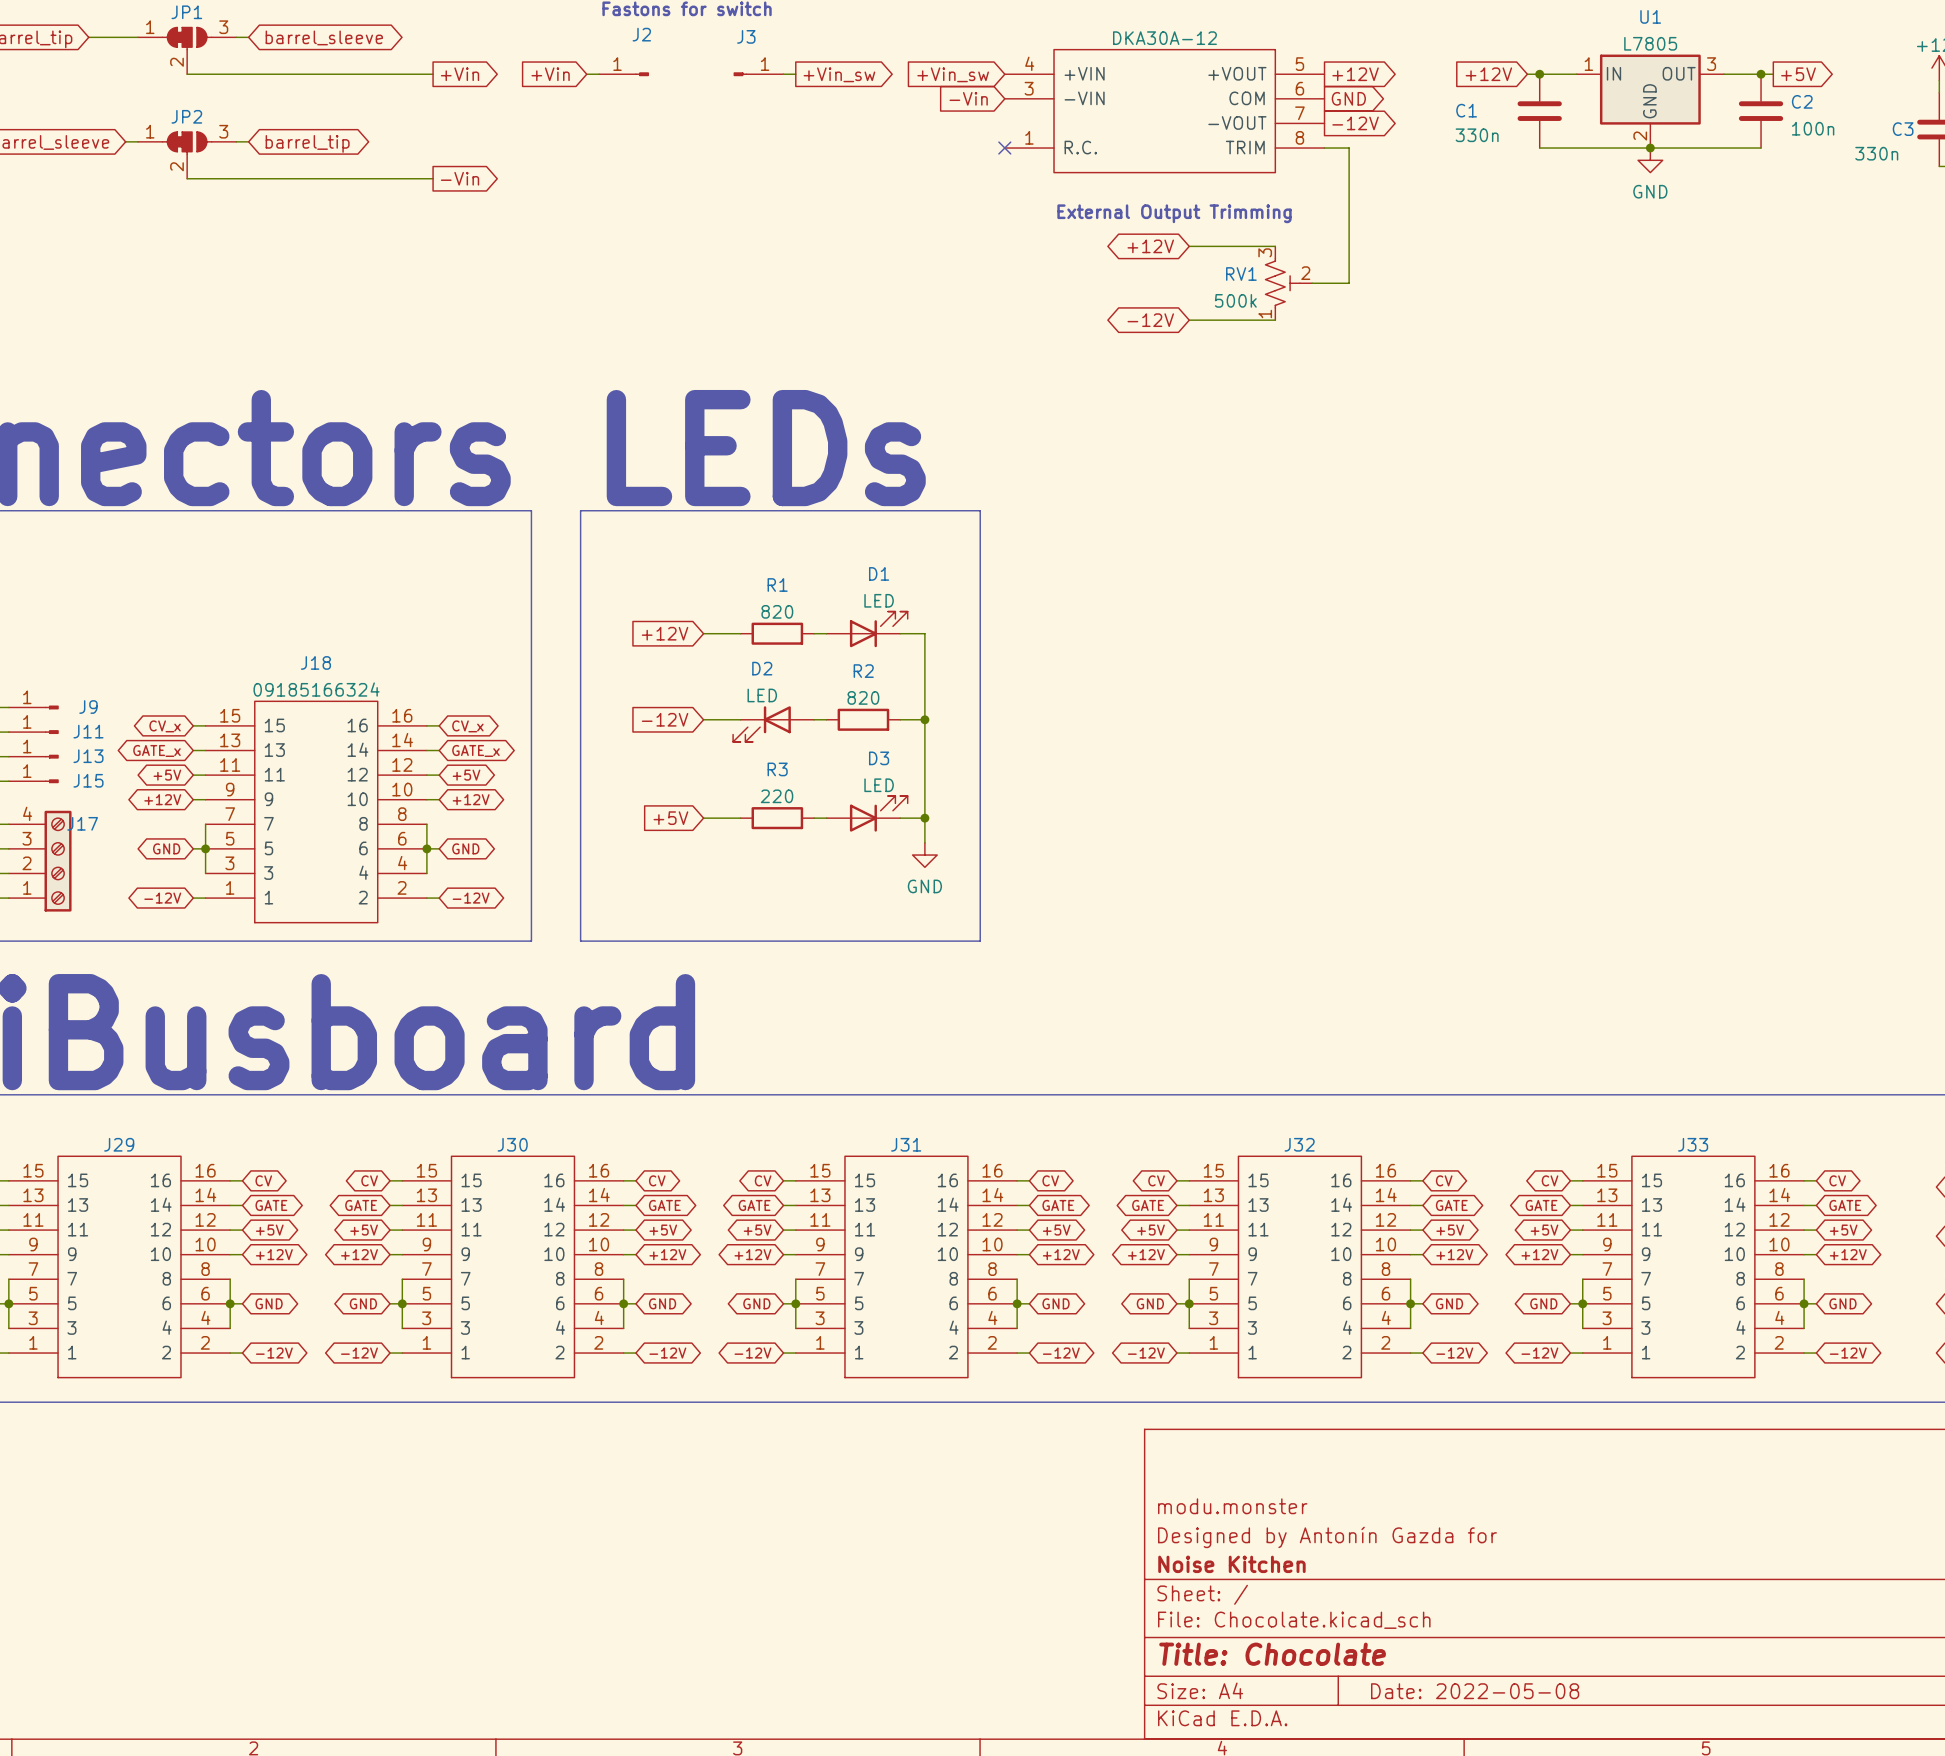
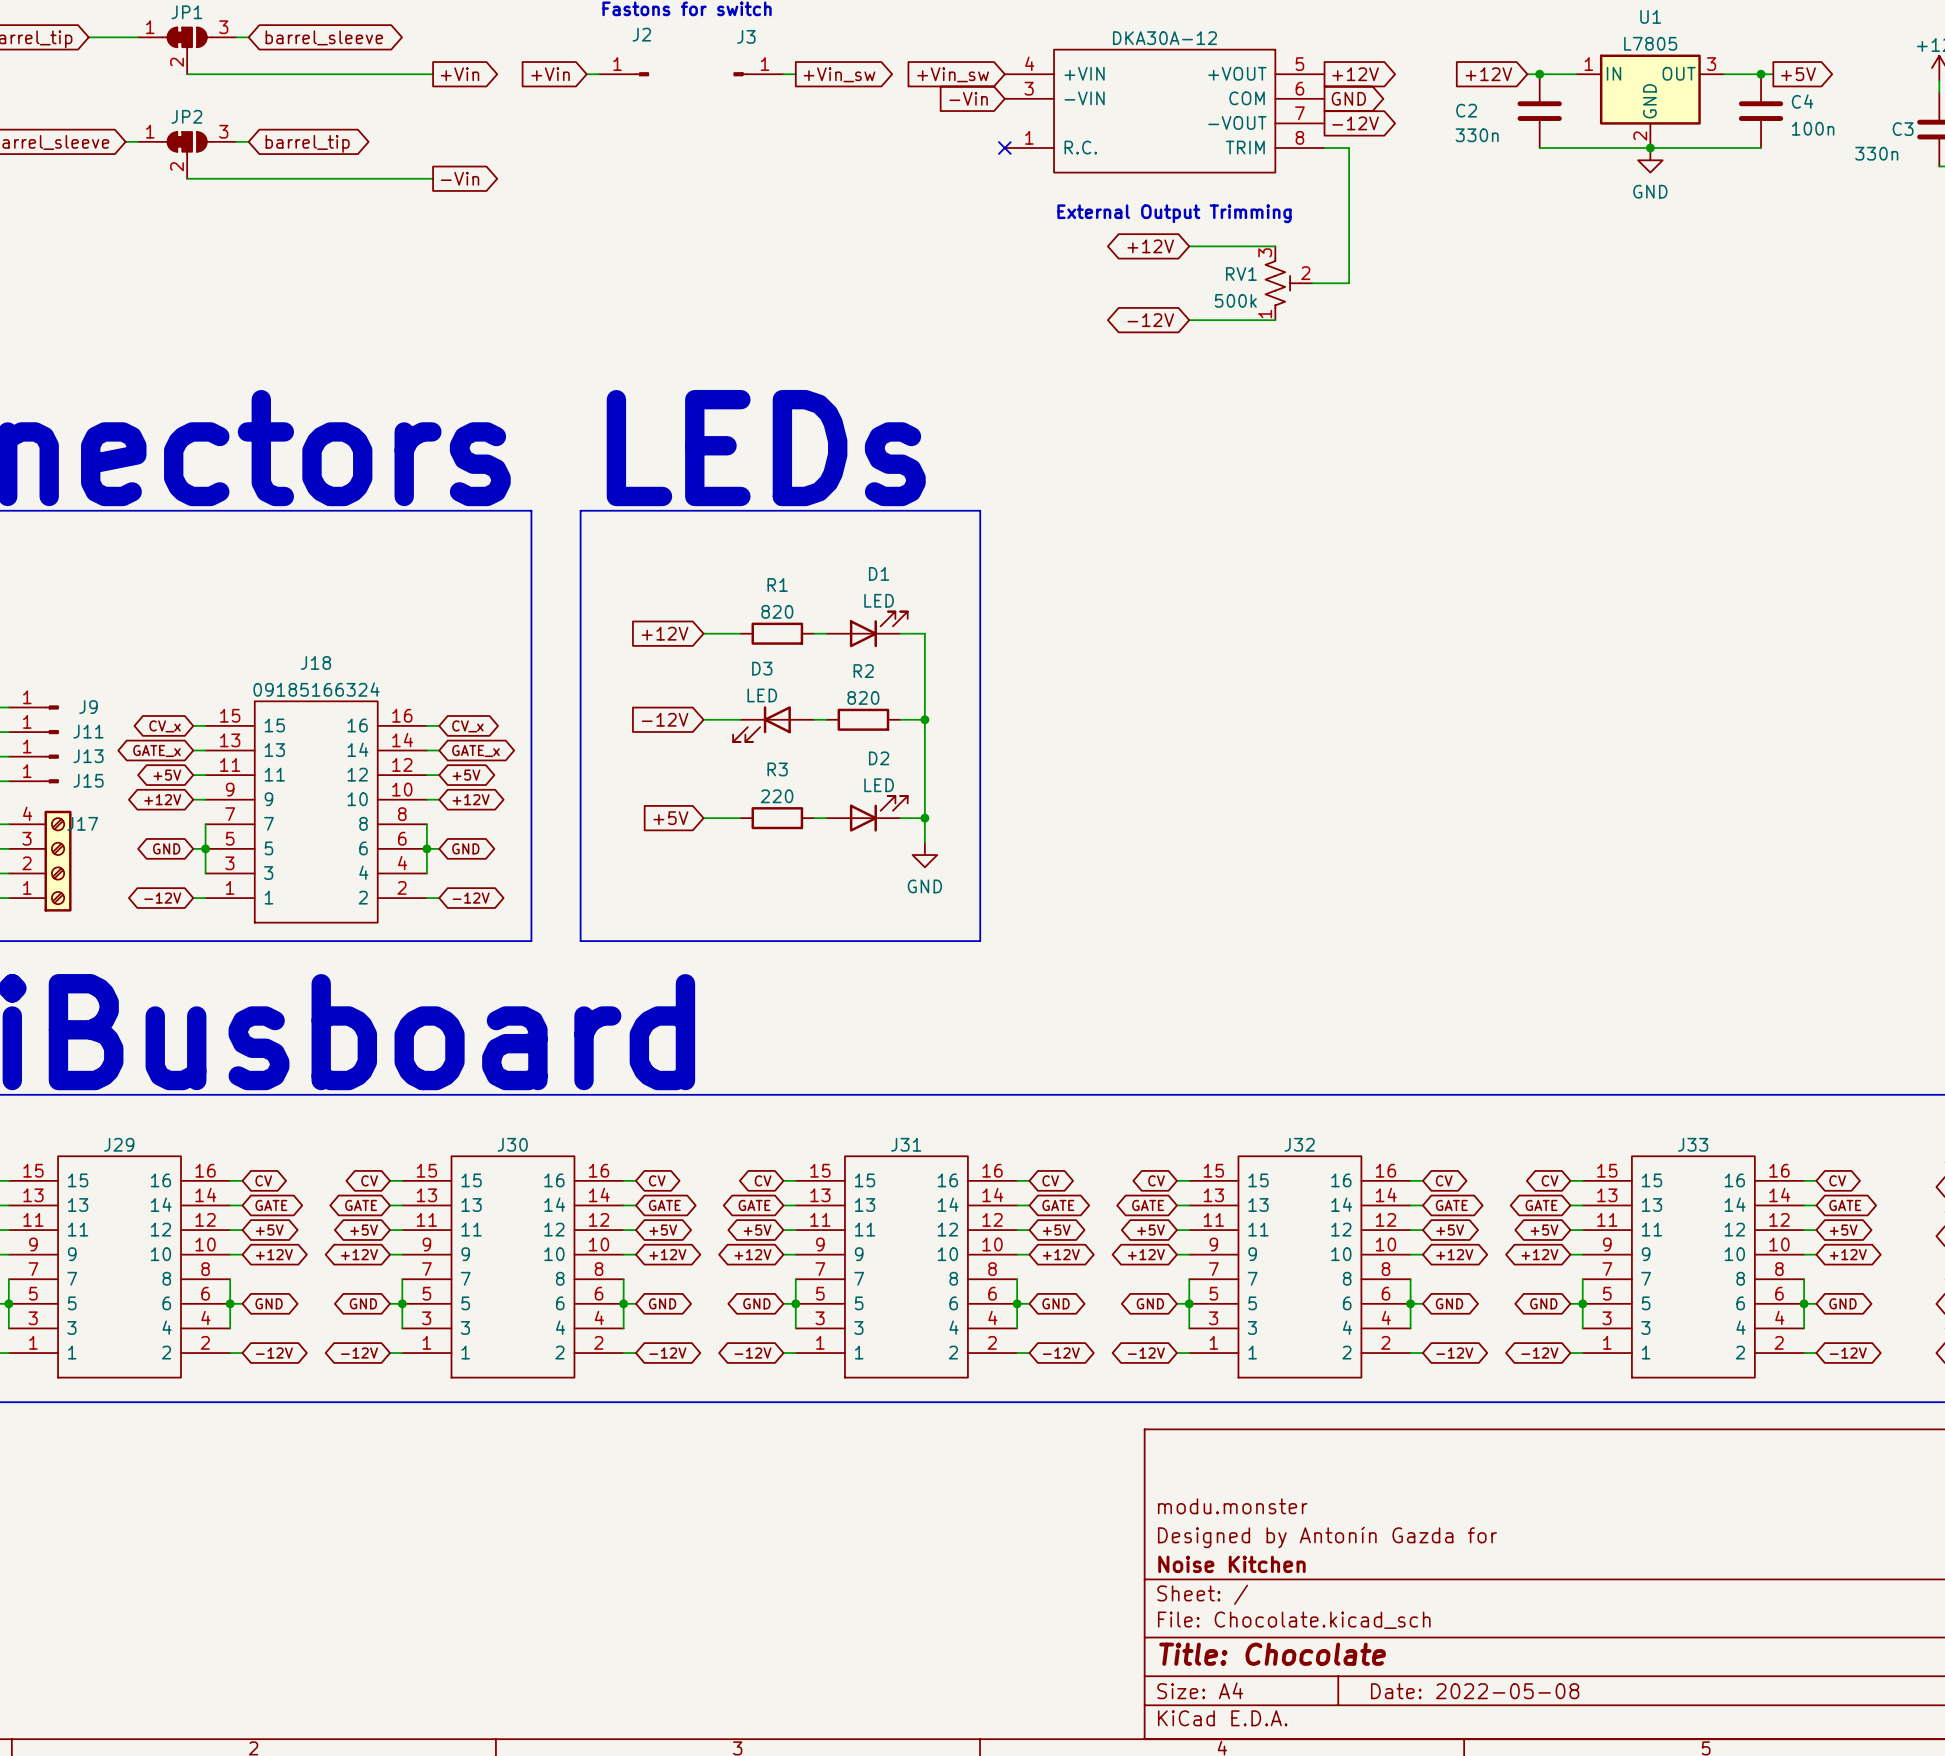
C2 name: C2 (1802, 101) -> C4 (1802, 101)
C1 name: C1 (1466, 110) -> C2 (1466, 110)
D2 name: D2 (762, 668) -> D3 (762, 668)
D3 name: D3 (879, 758) -> D2 (879, 758)

